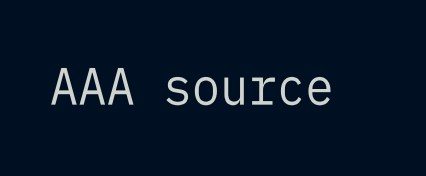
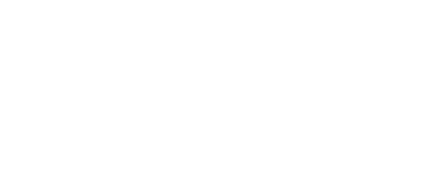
text: AAA source (190, 86) -> none

